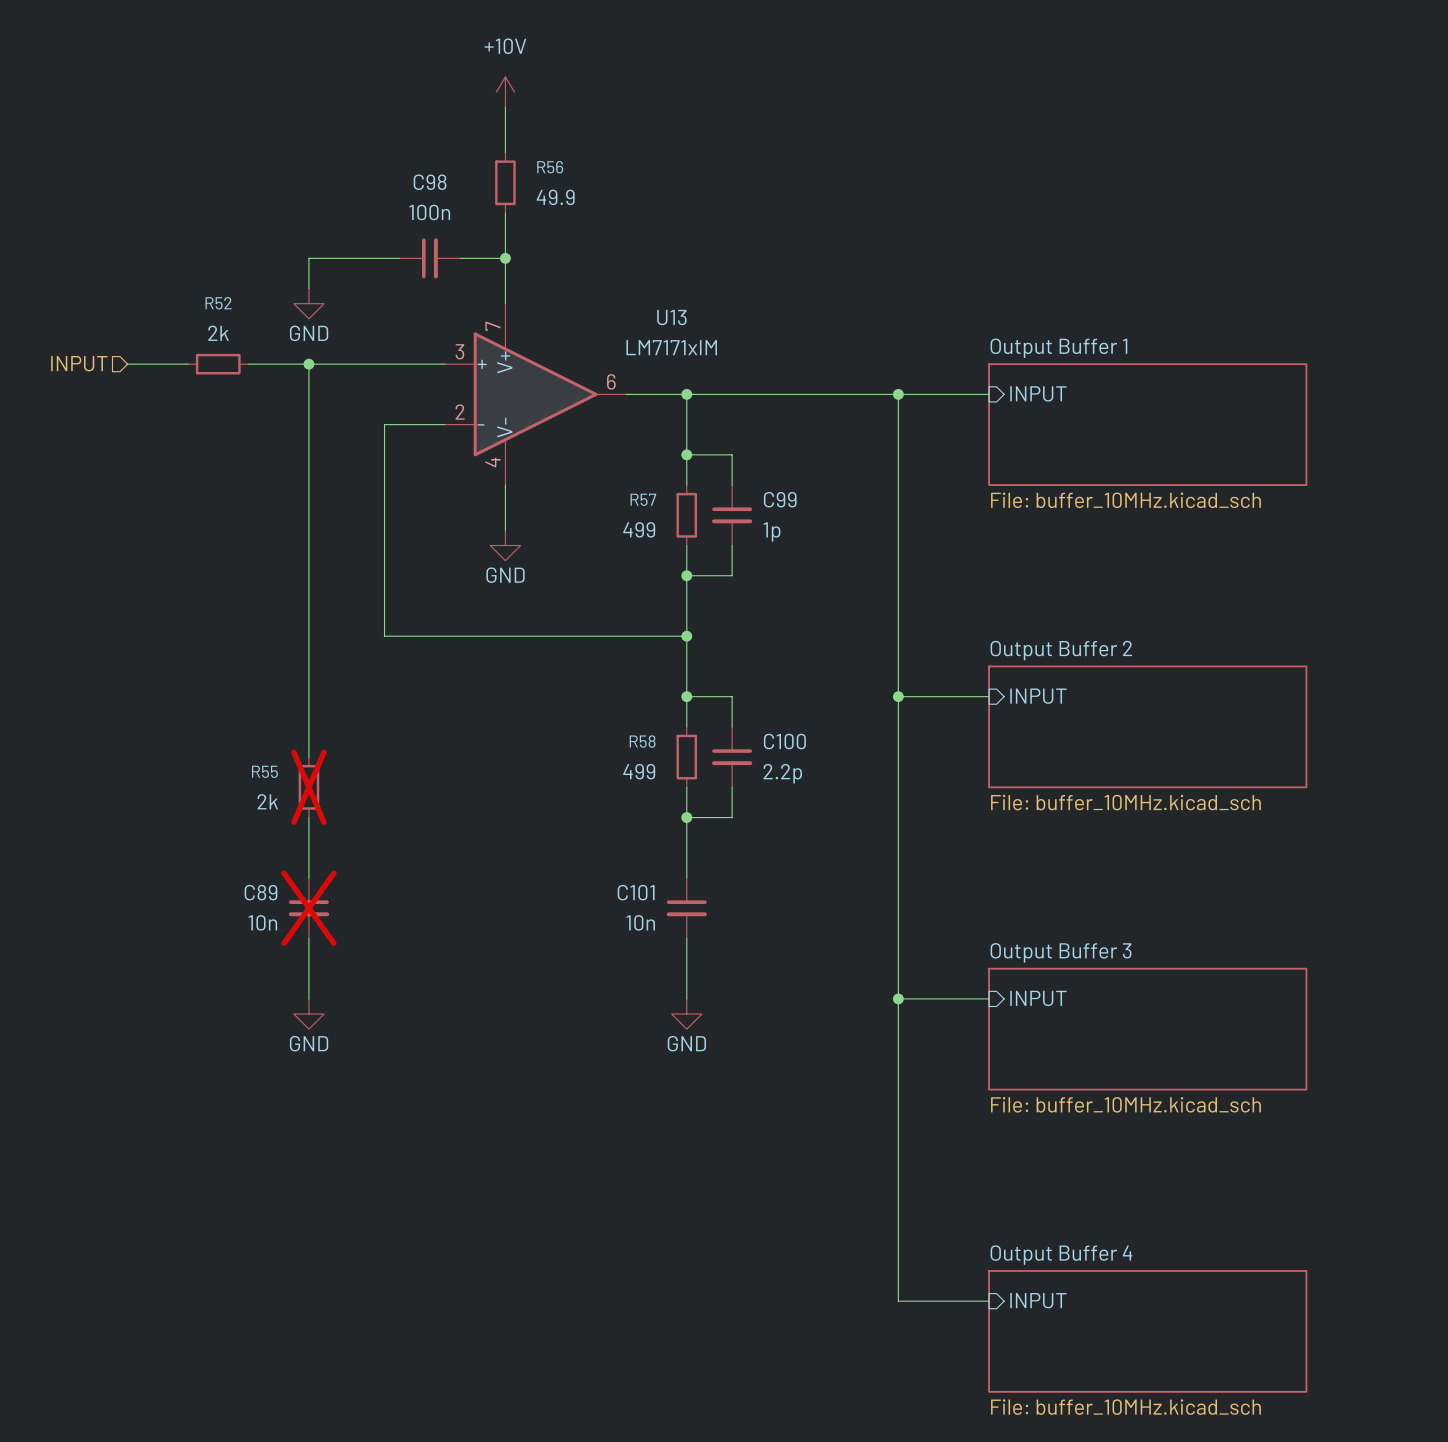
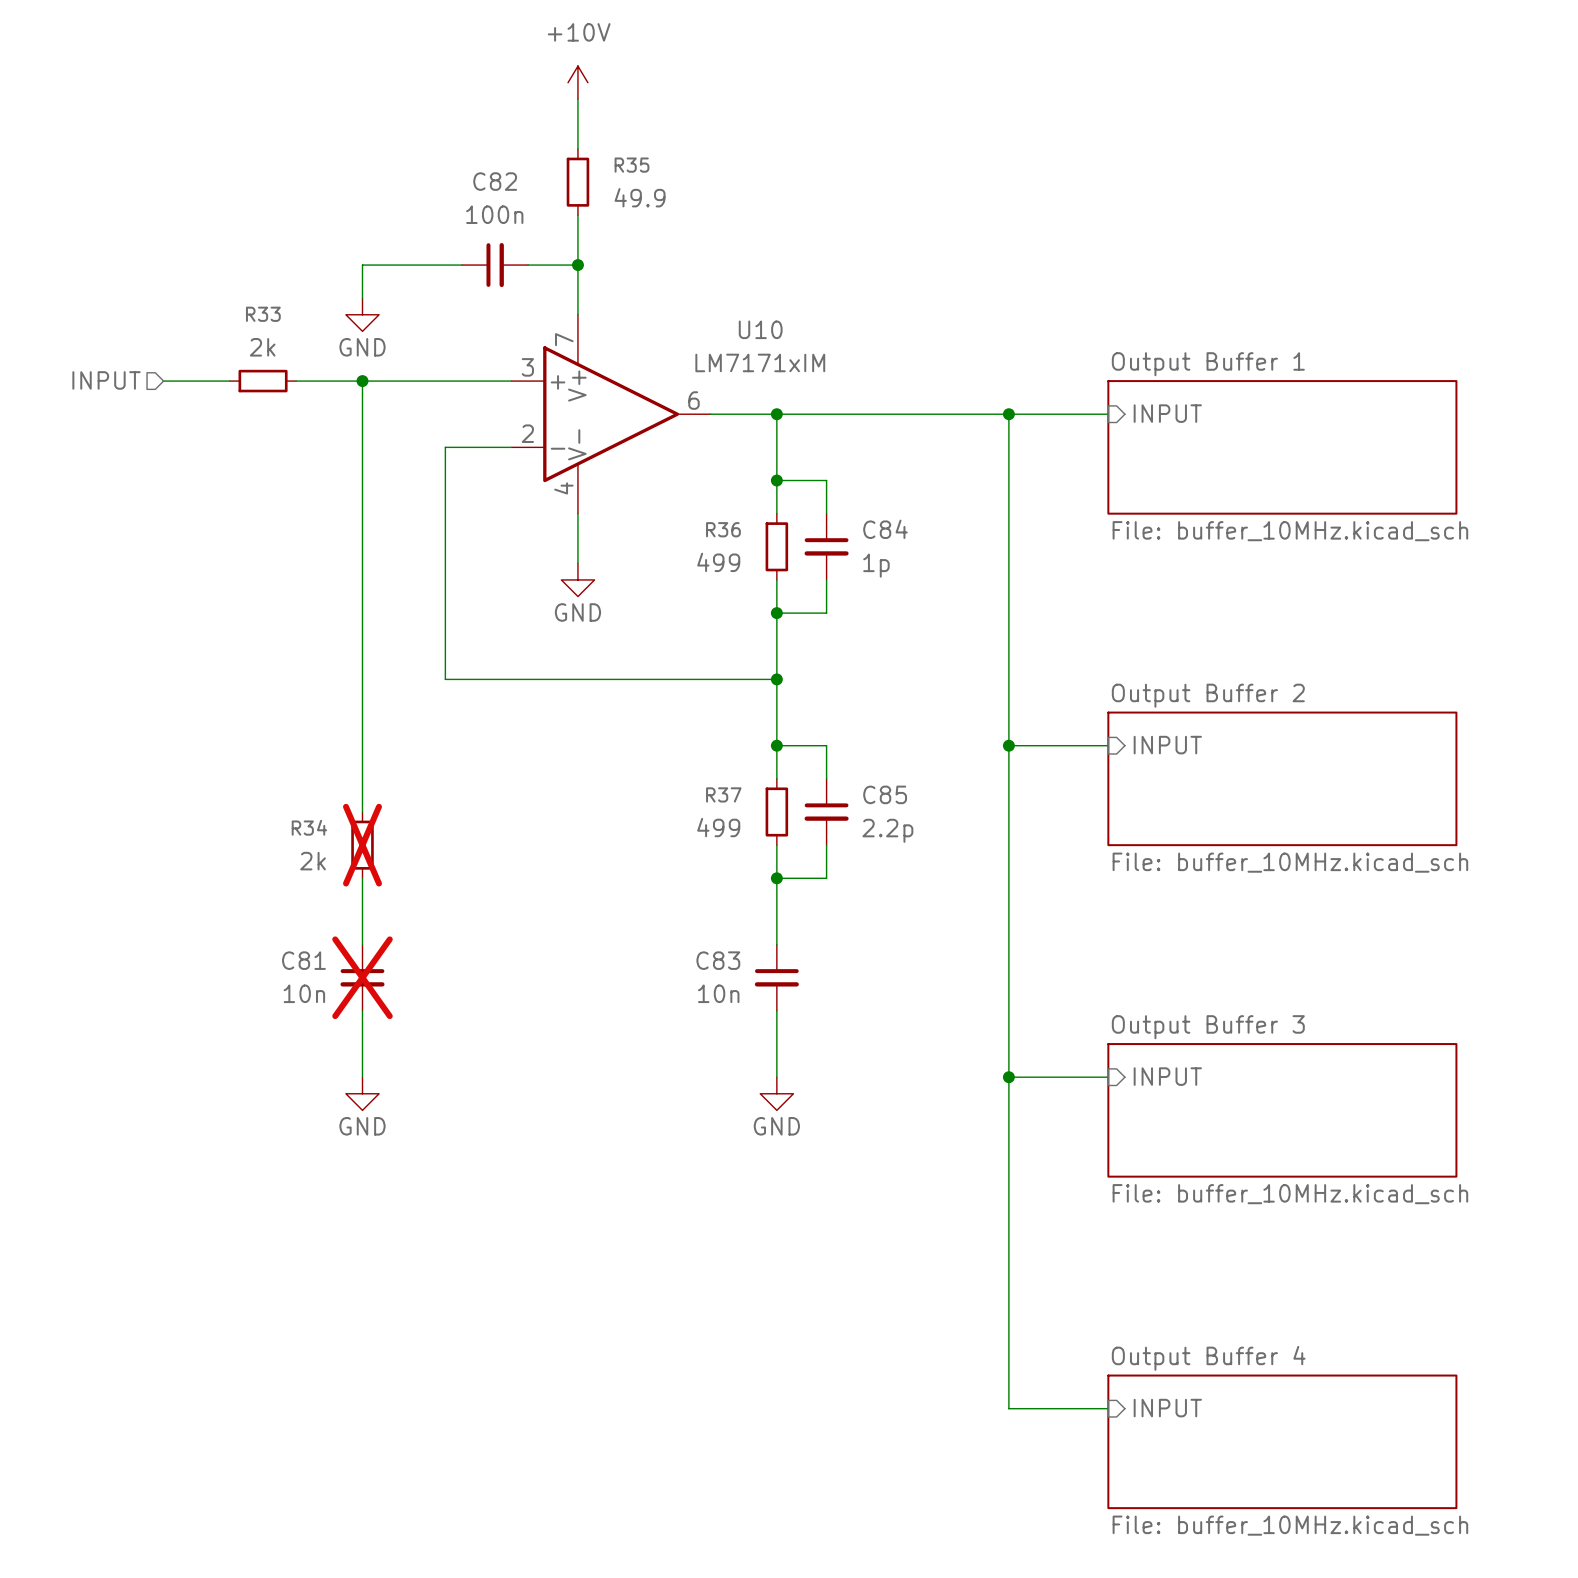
R56 name: R56 (550, 167) -> R35 (631, 165)
C98 name: C98 (430, 182) -> C82 (495, 181)
R52 name: R52 (218, 303) -> R33 (263, 314)
U13 name: U13 (671, 317) -> U10 (760, 329)
R57 name: R57 (643, 499) -> R36 (723, 529)
C99 name: C99 (780, 499) -> C84 (885, 529)
R58 name: R58 (642, 741) -> R37 (723, 794)
C100 name: C100 (784, 741) -> C85 (885, 794)
R55 name: R55 (264, 771) -> R34 (309, 827)
C89 name: C89 (261, 892) -> C81 (303, 960)
C101 name: C101 (636, 892) -> C83 (718, 960)

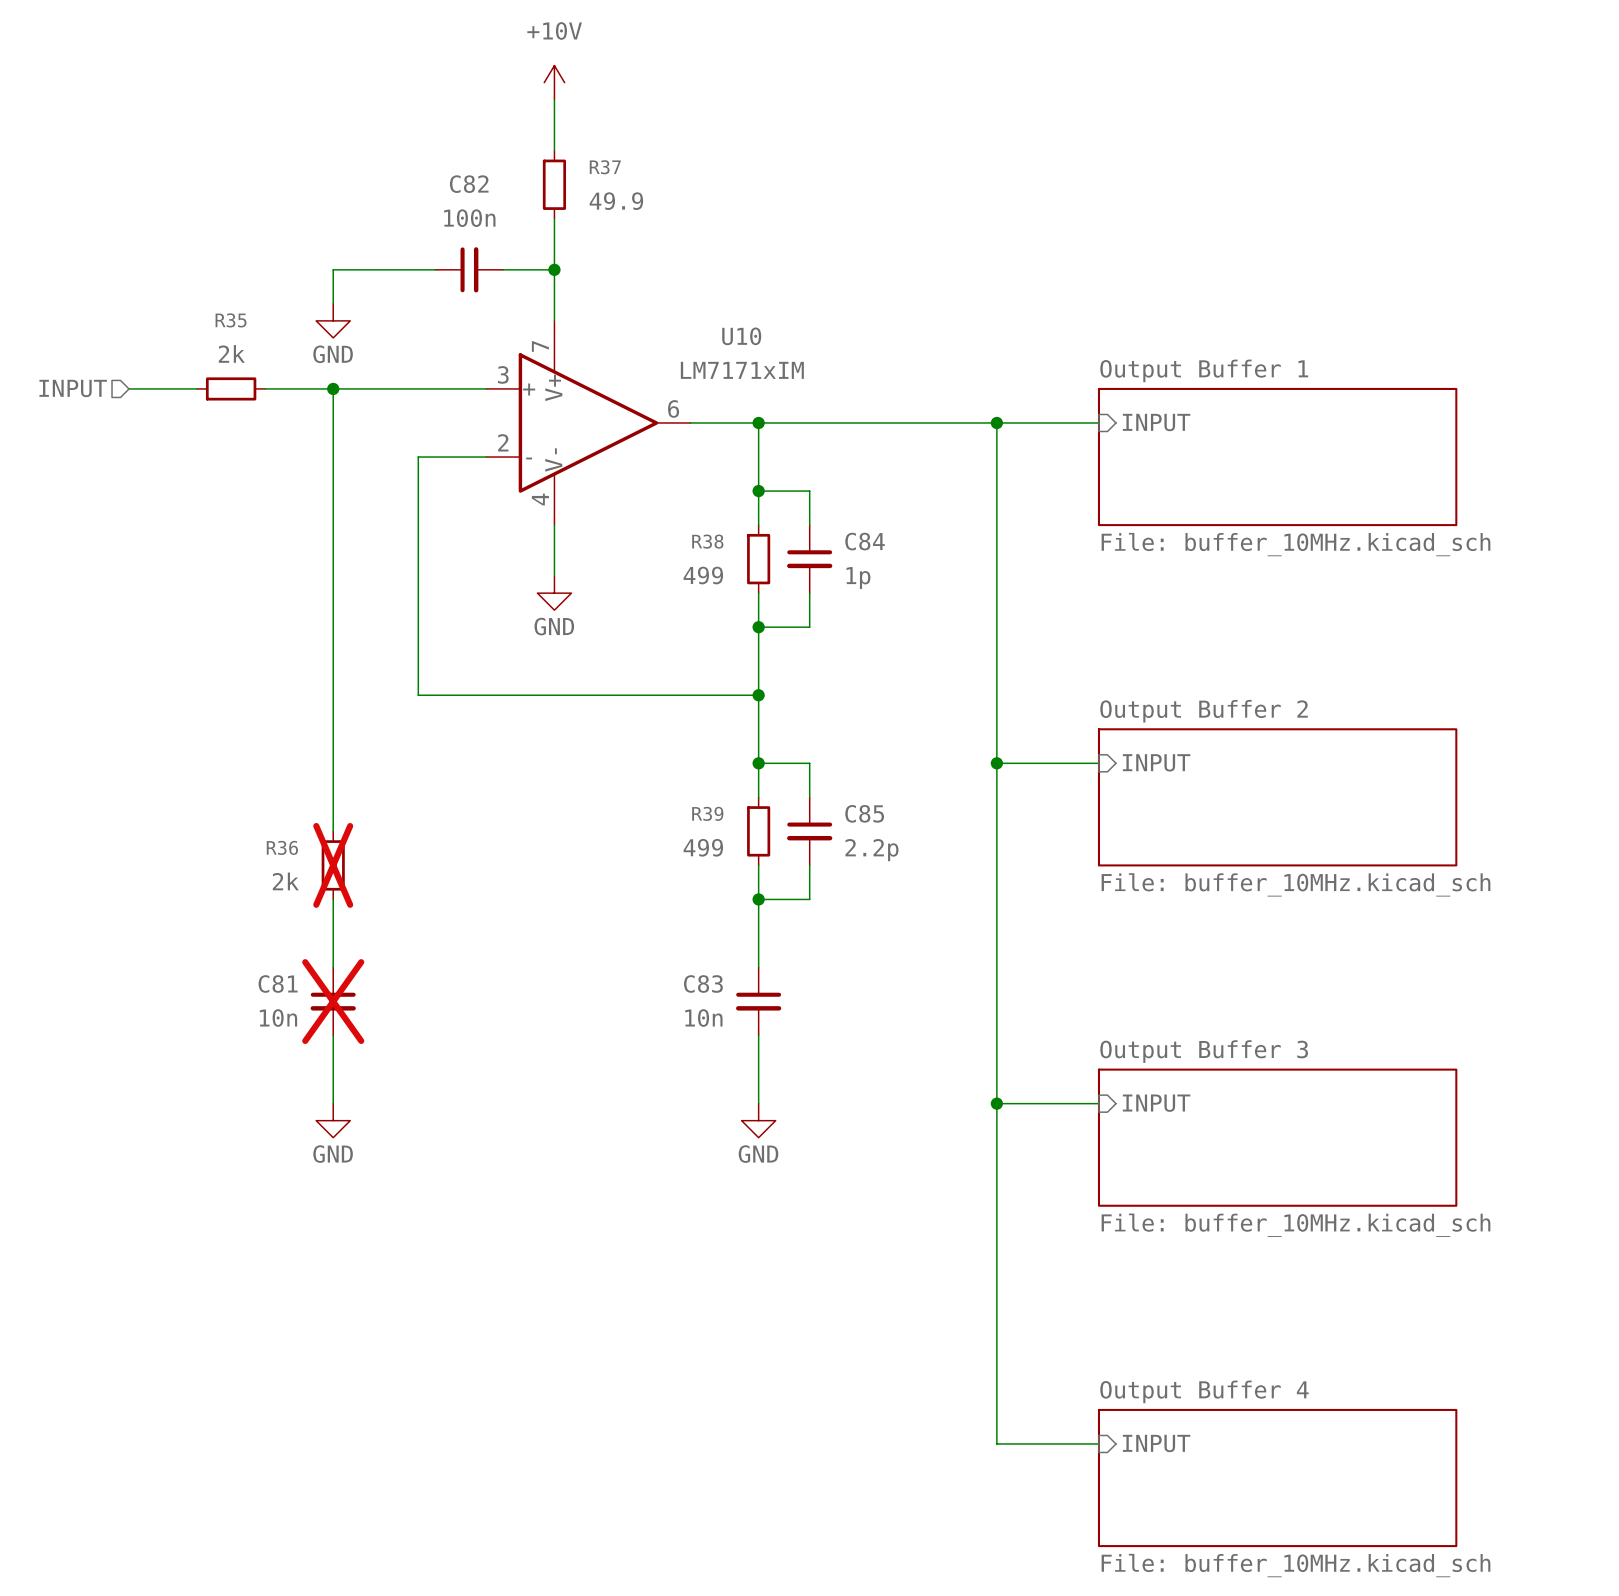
R35 name: R35 (631, 165) -> R37 (605, 167)
R33 name: R33 (263, 314) -> R35 (231, 320)
R36 name: R36 (723, 529) -> R38 (707, 541)
R37 name: R37 (723, 794) -> R39 (707, 813)
R34 name: R34 (309, 827) -> R36 (282, 847)

